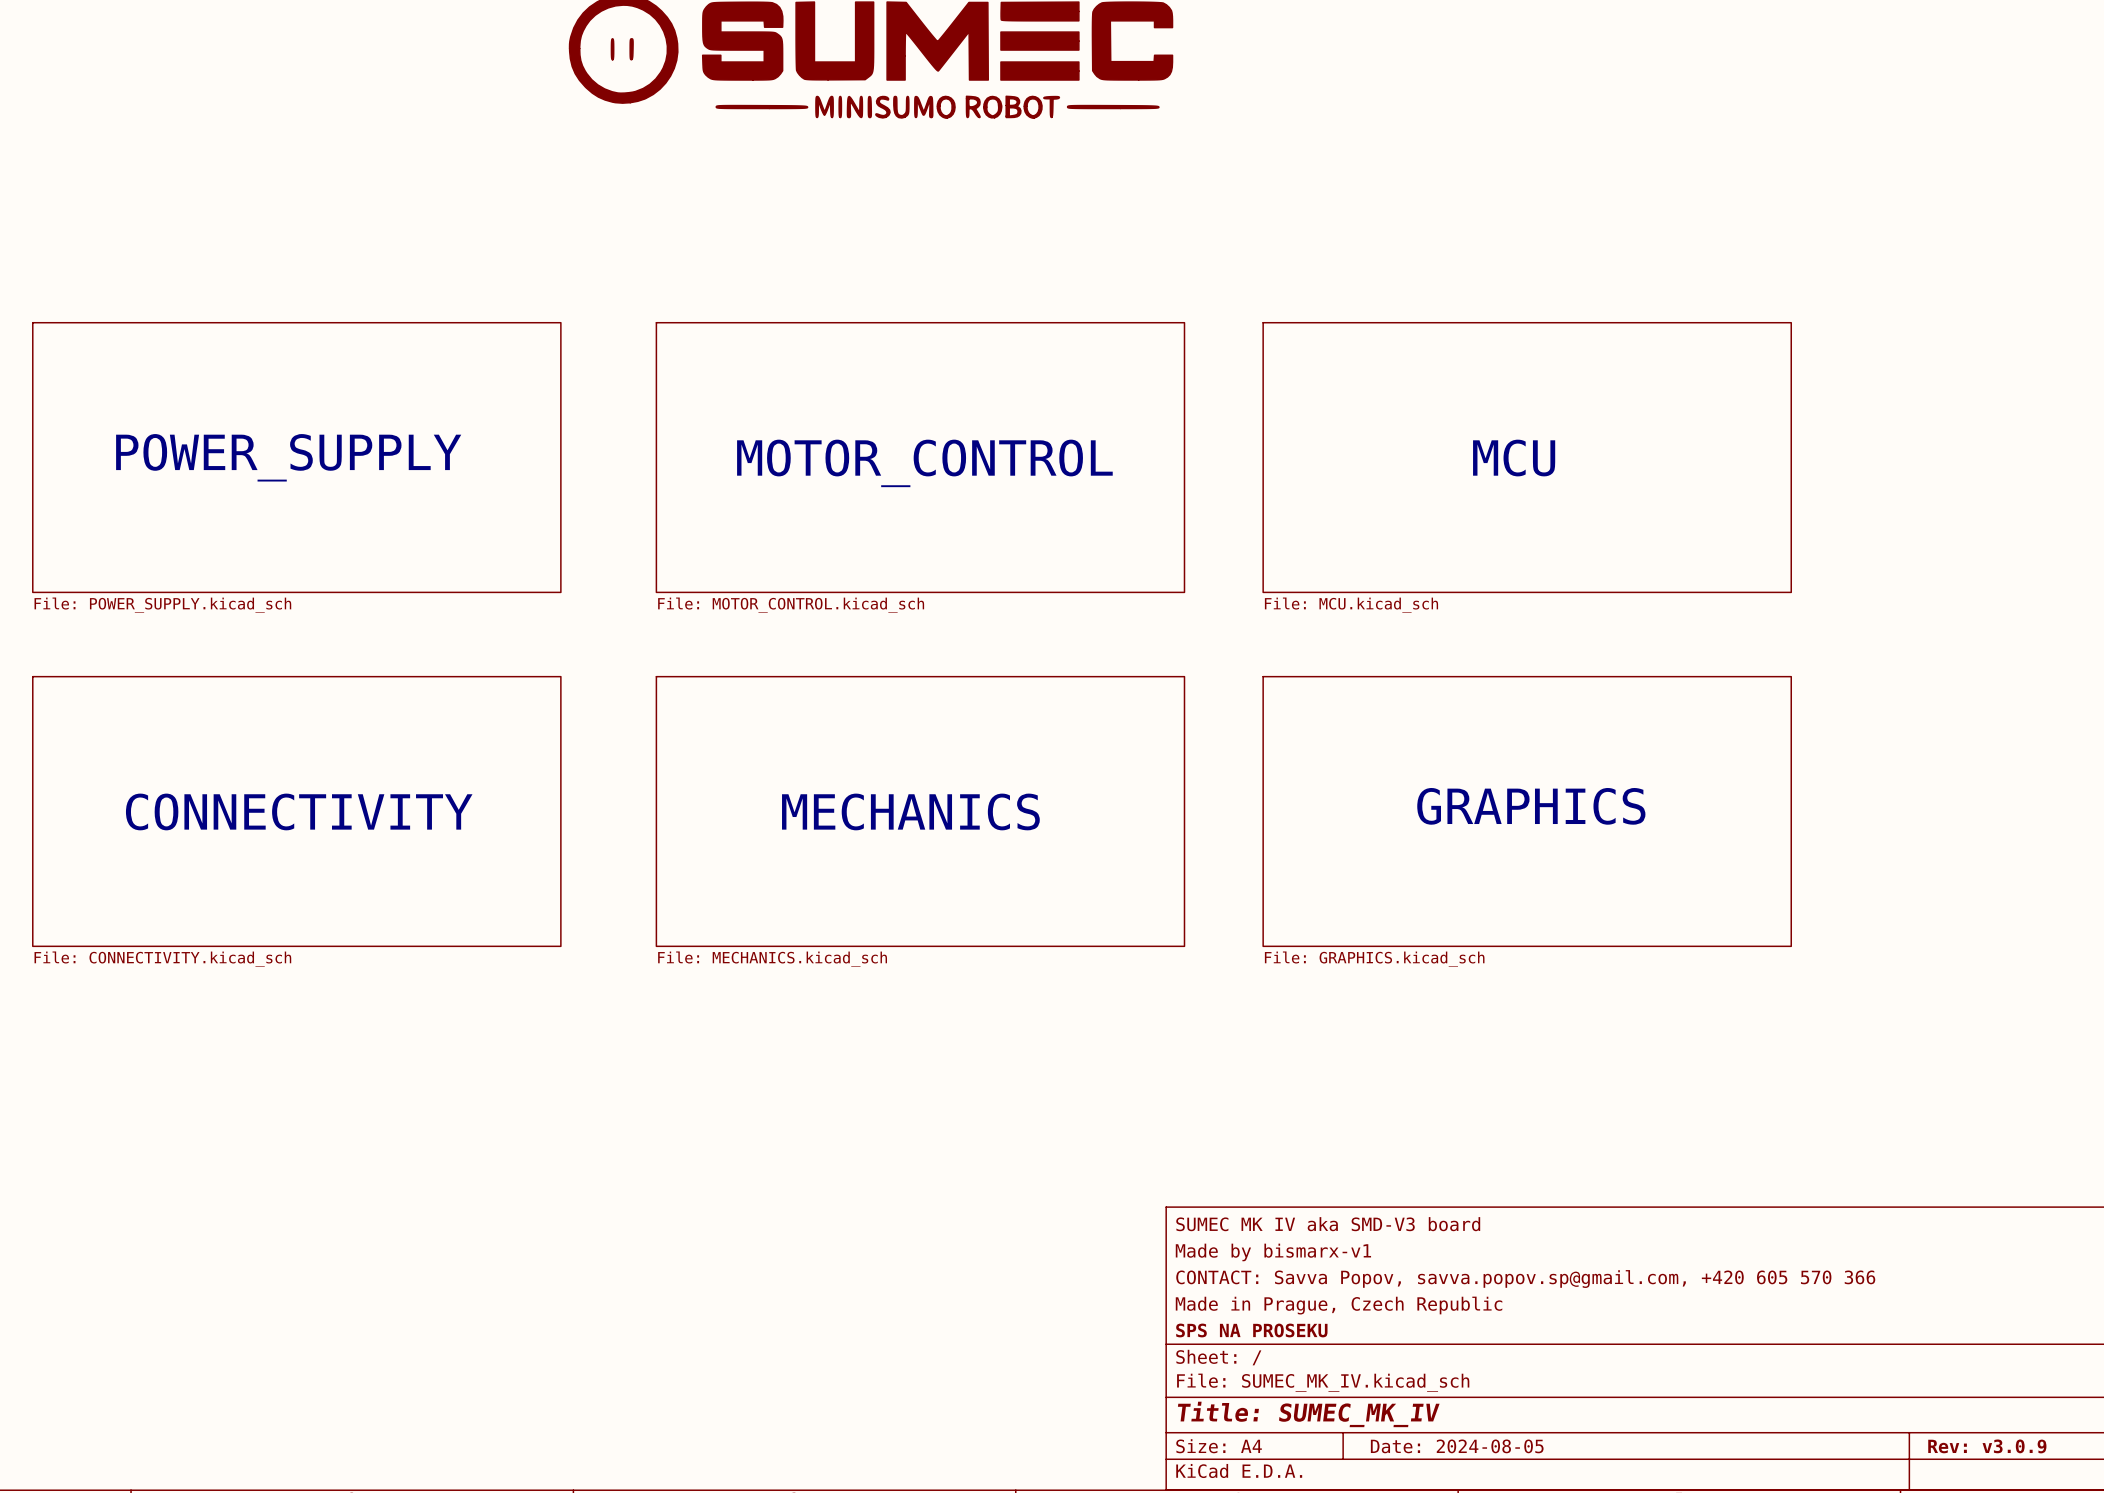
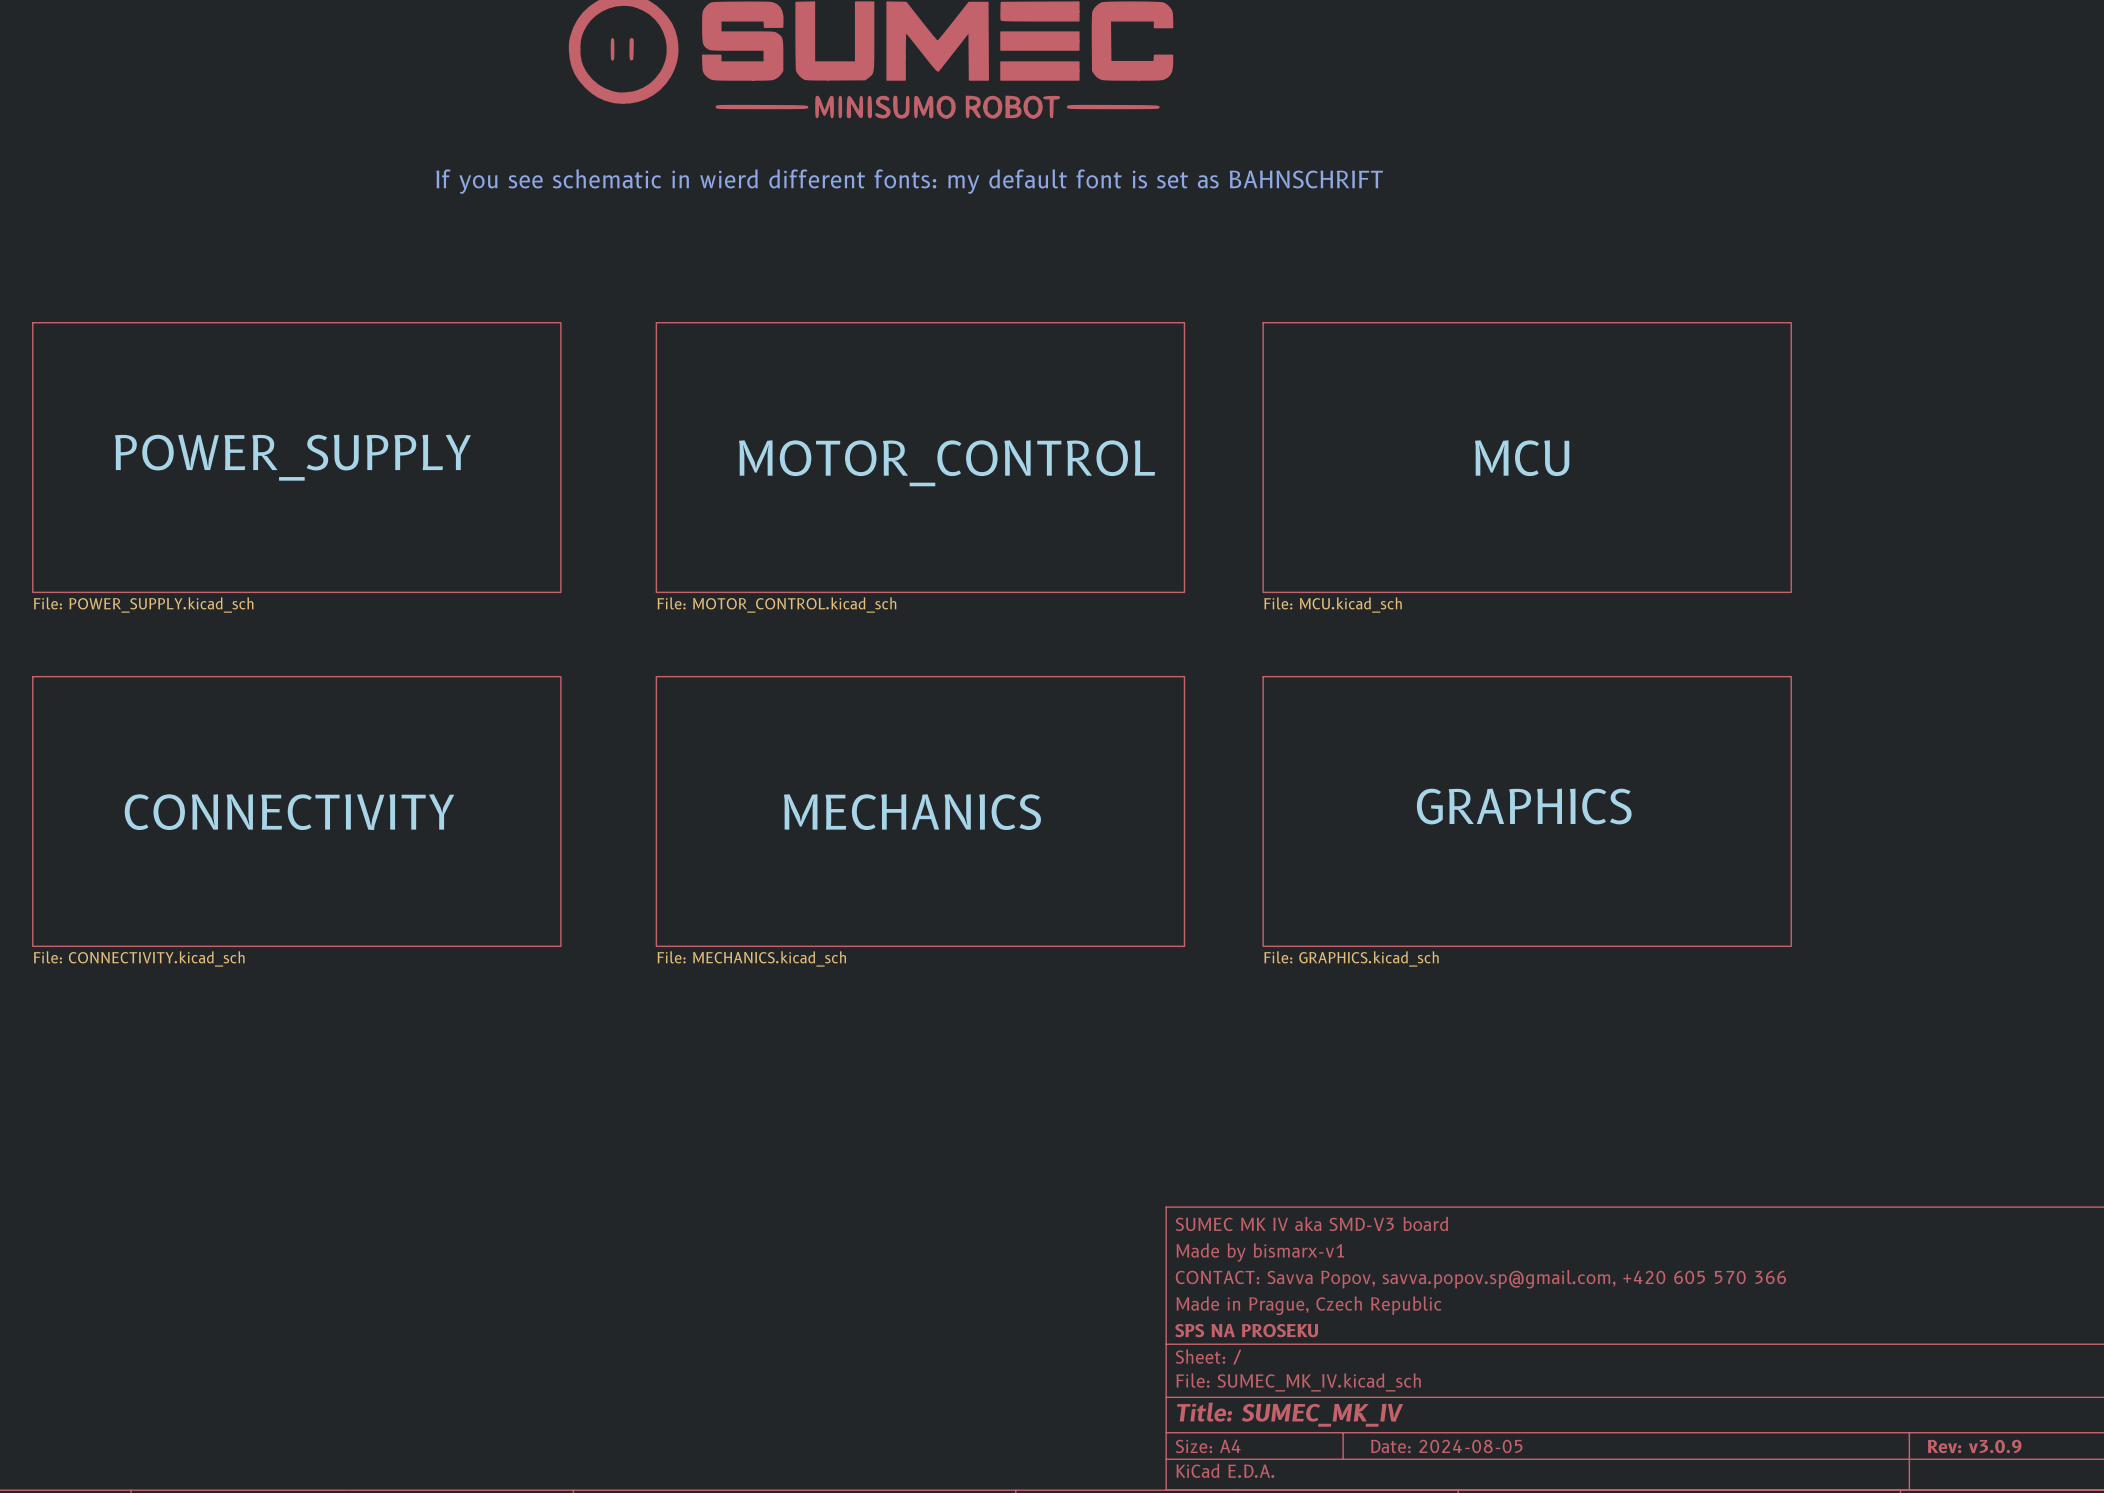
text: none -> If you see schematic in wierd different fonts: my default font is set as BAHNSCHRIFT (909, 181)

